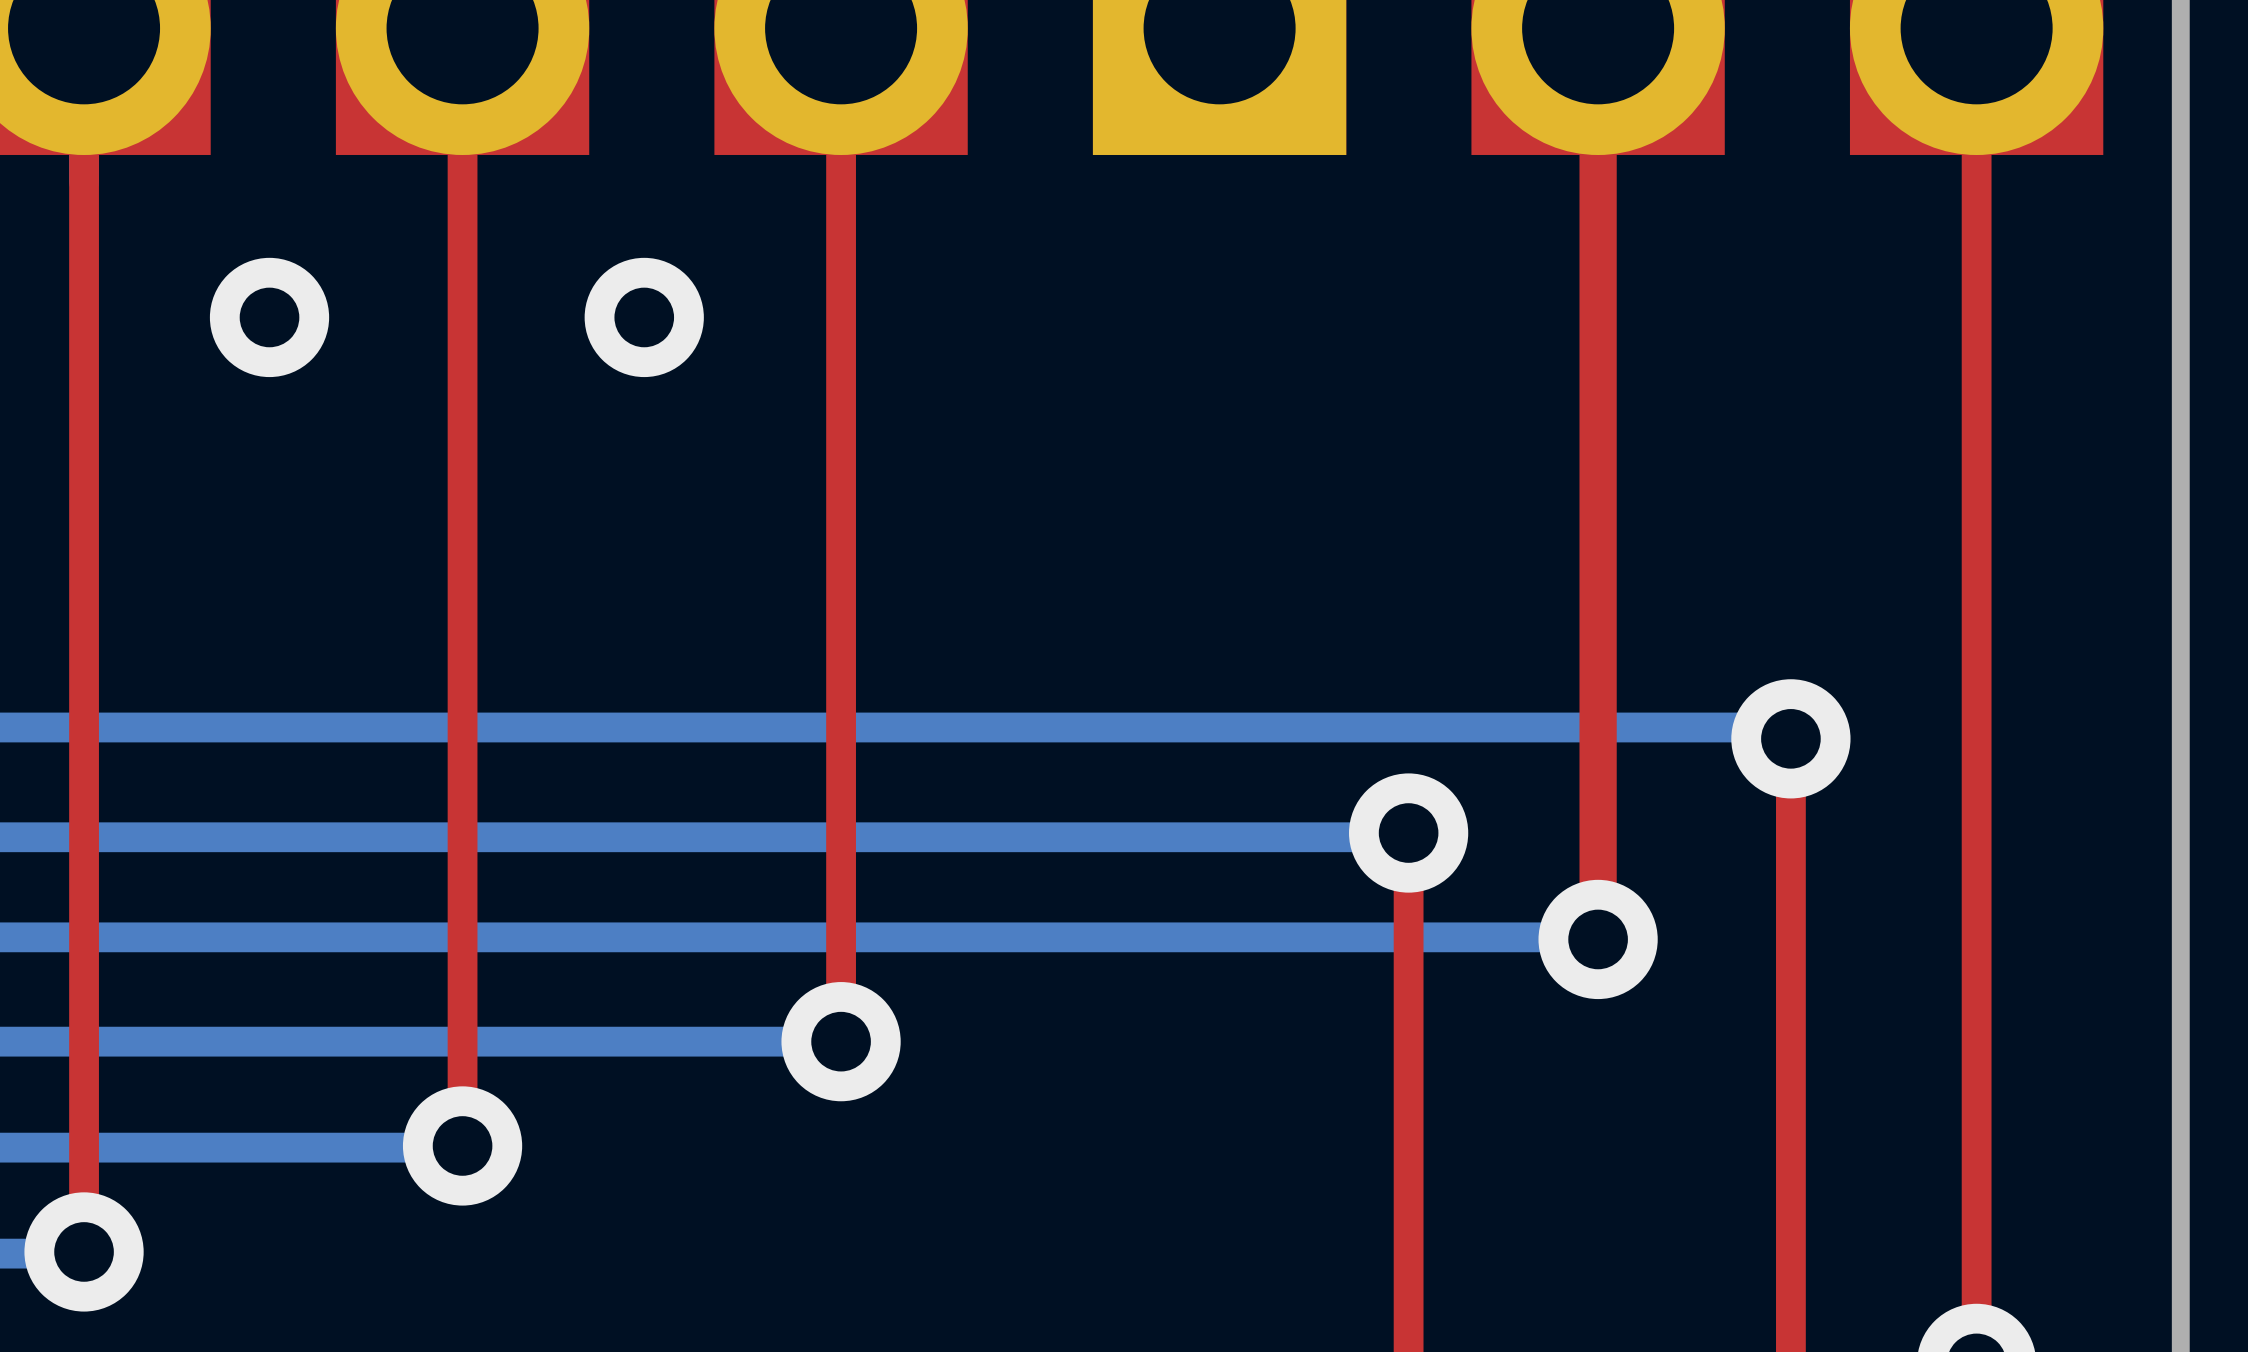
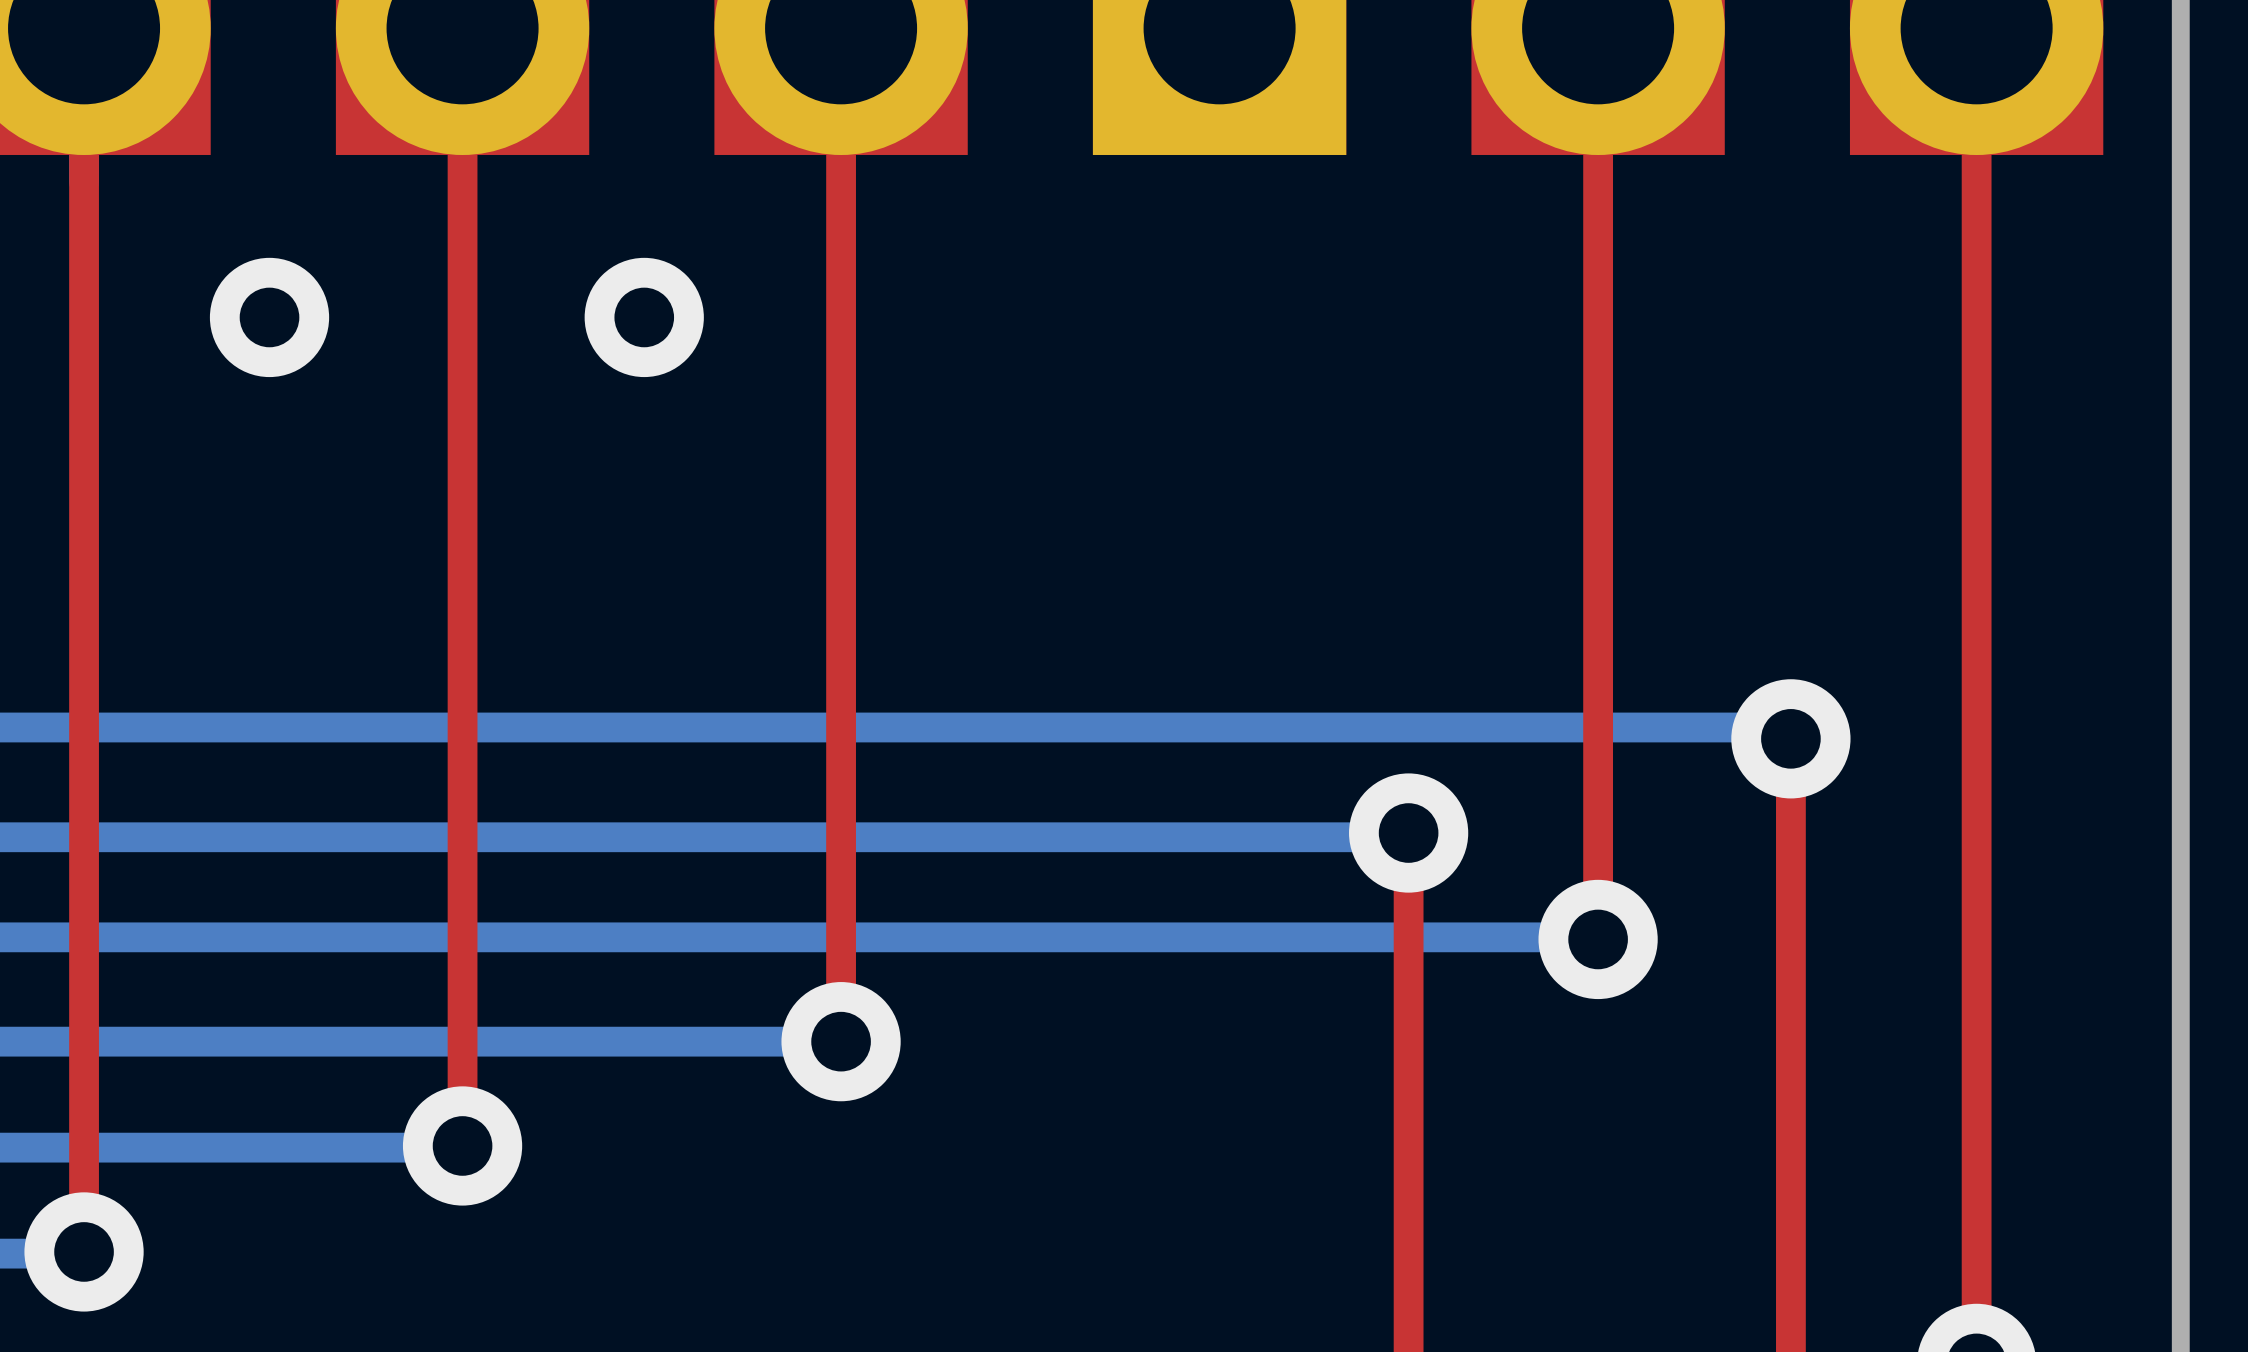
top track width: thick (1598, 28) (1598, 939) -> thin (1598, 28) (1598, 939)

